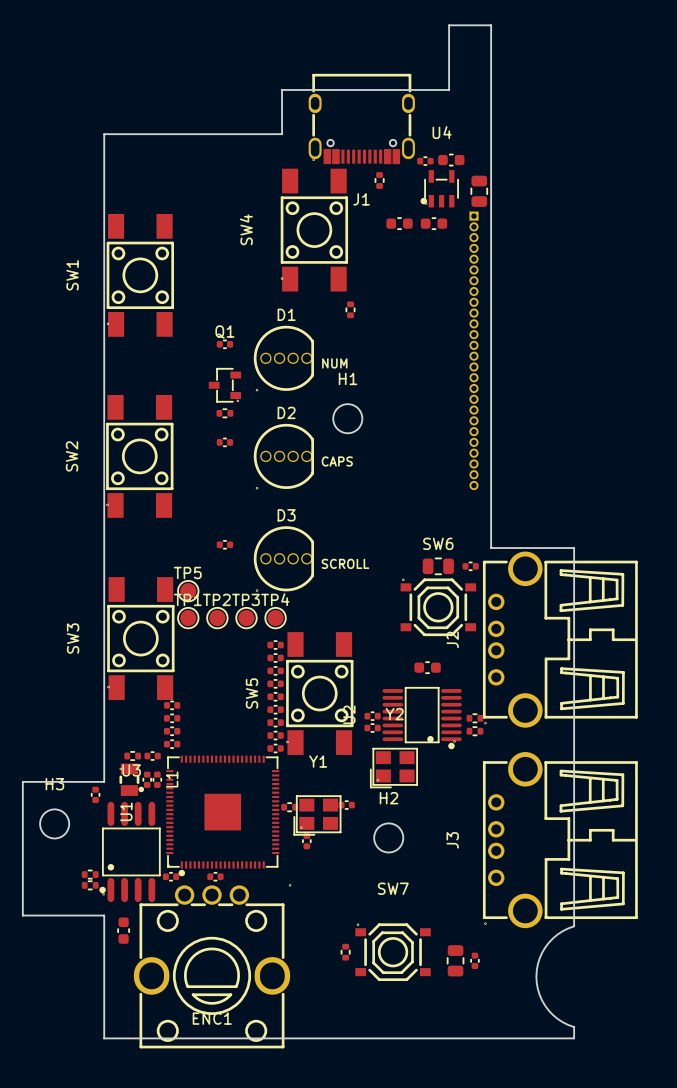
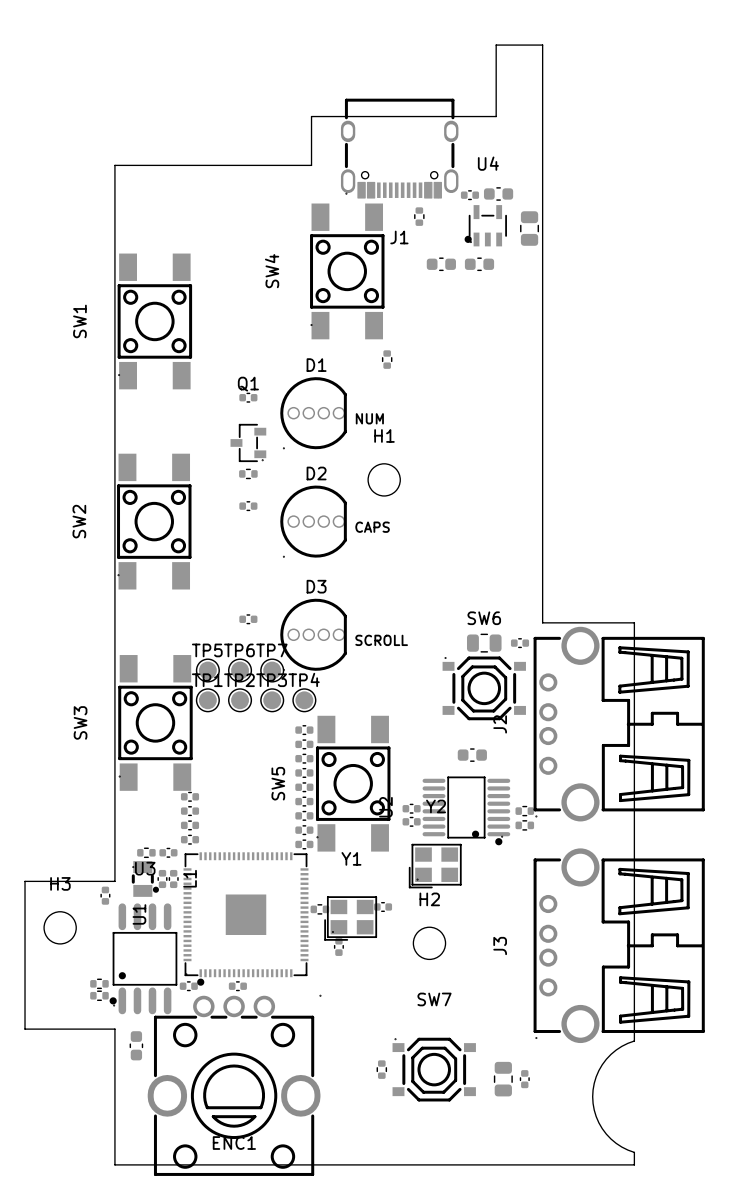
part: (473, 350) -> none
TP6: none -> (240, 670)
TP7: none -> (272, 670)

